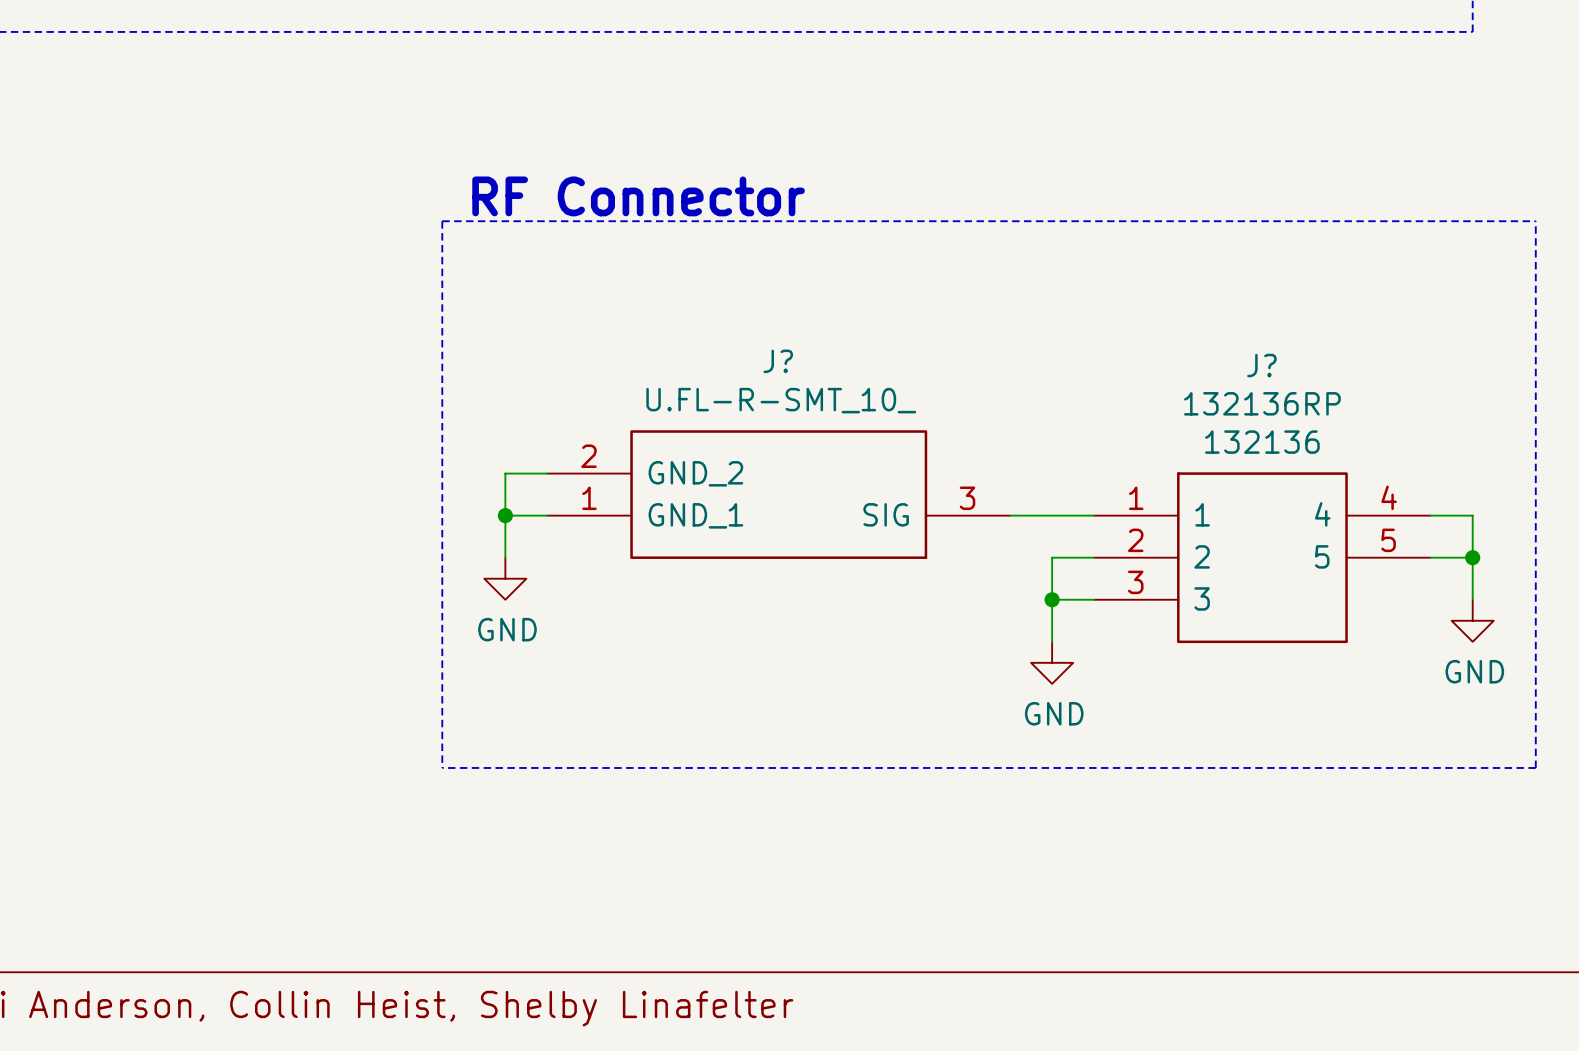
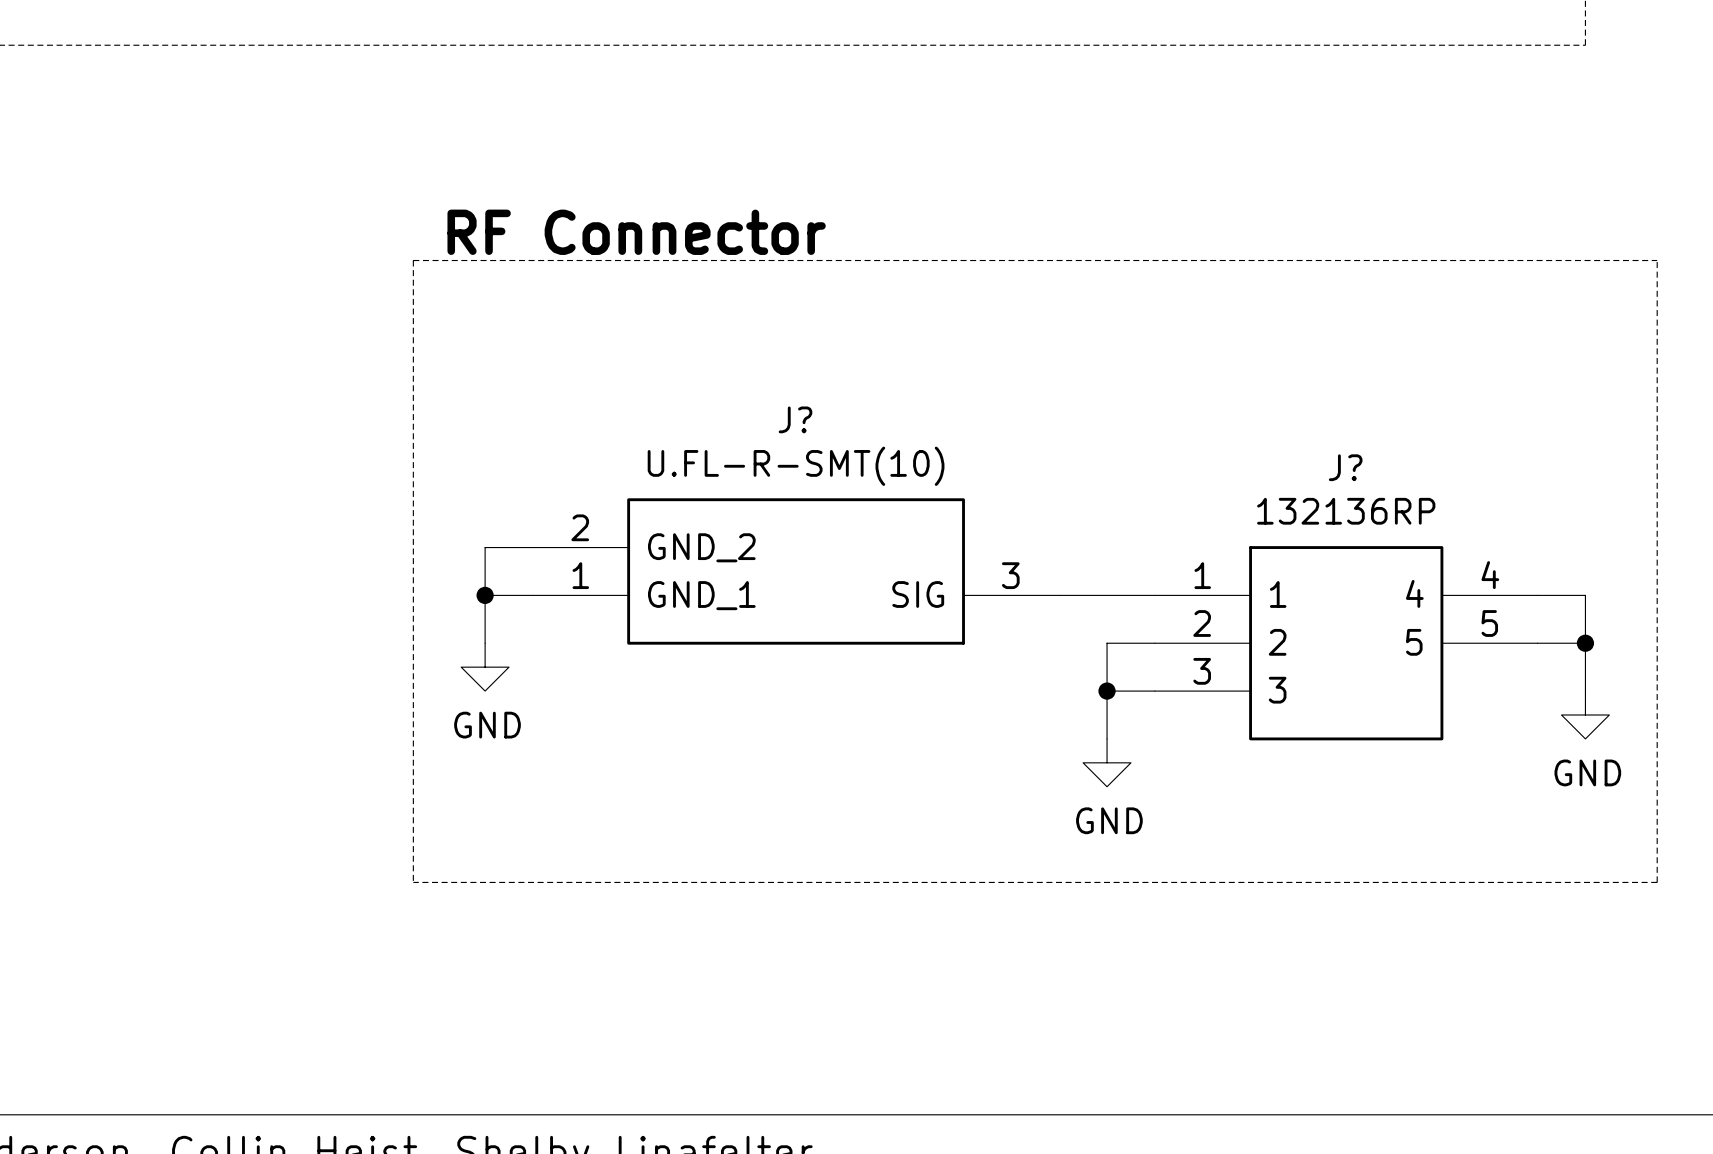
J? name position: J? (1261, 365) -> J? (1345, 467)
J? value: U.FL-R-SMT_10_ (781, 400) -> none
J? text: none -> U.FL-R-SMT(10) (796, 466)
J? value: 132136RP (1262, 403) -> none
J? text: 132136 (1262, 442) -> 132136RP (1346, 511)

